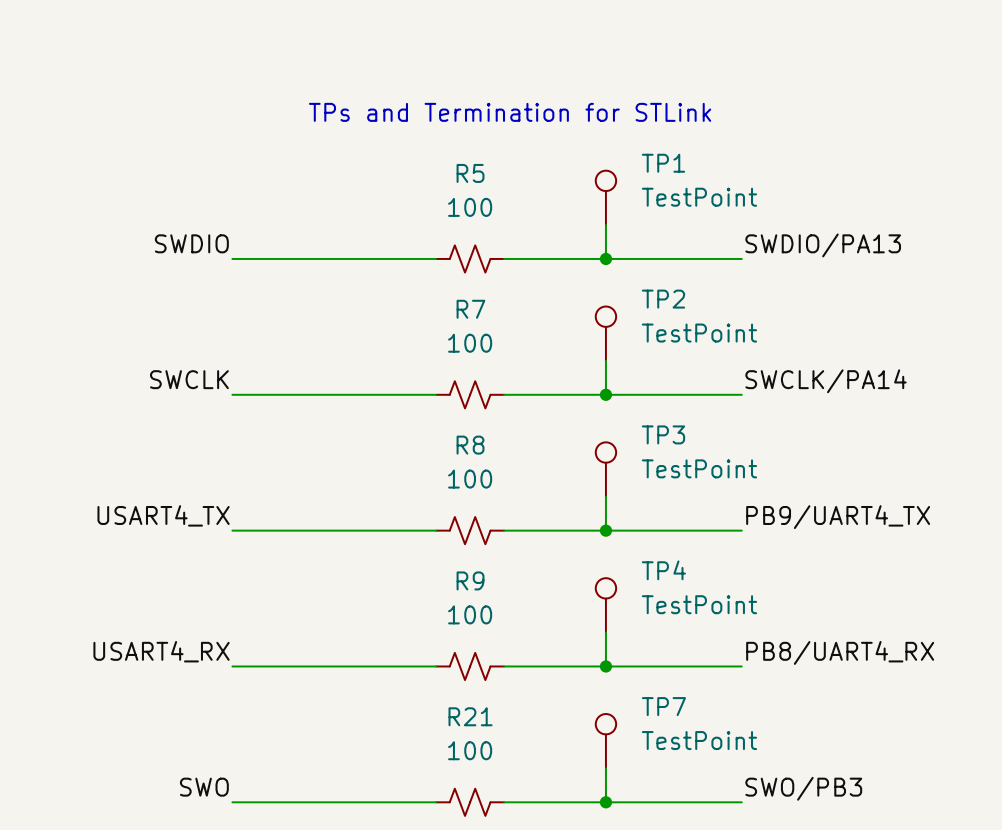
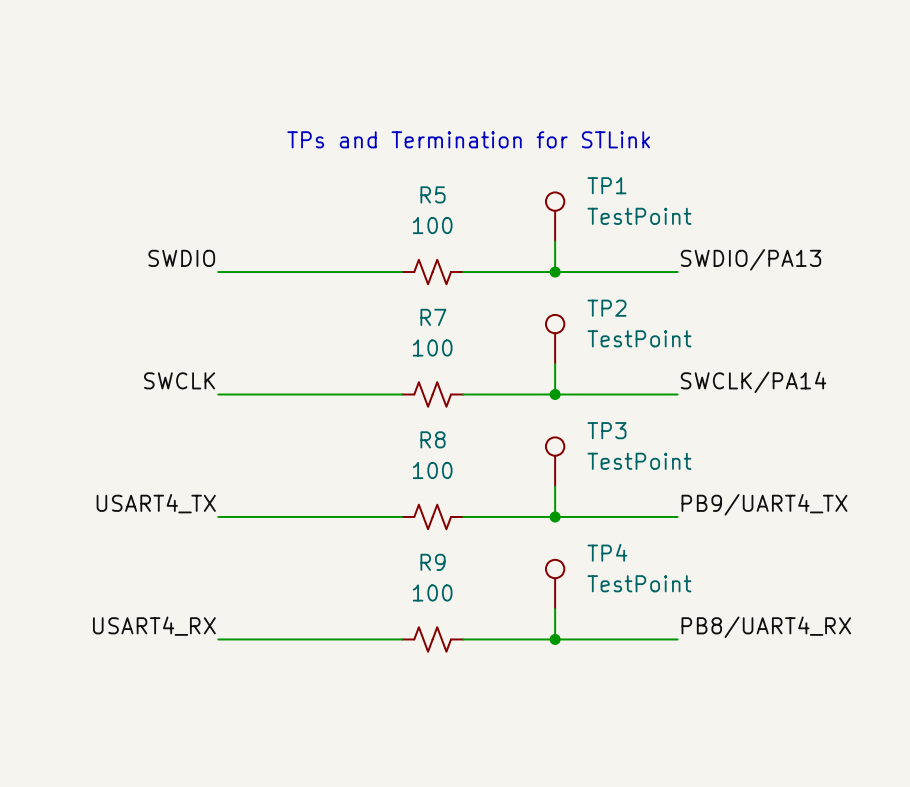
TP7: TestPoint (605, 741) -> none
wire: (605, 768) (605, 802) -> none
label: SWO (204, 787) -> none
label: SWO/PB3 (803, 788) -> none
wire: (232, 802) (436, 802) -> none
R21: 100 (470, 802) -> none
wire: (504, 802) (741, 802) -> none
junction: (605, 802) -> none

